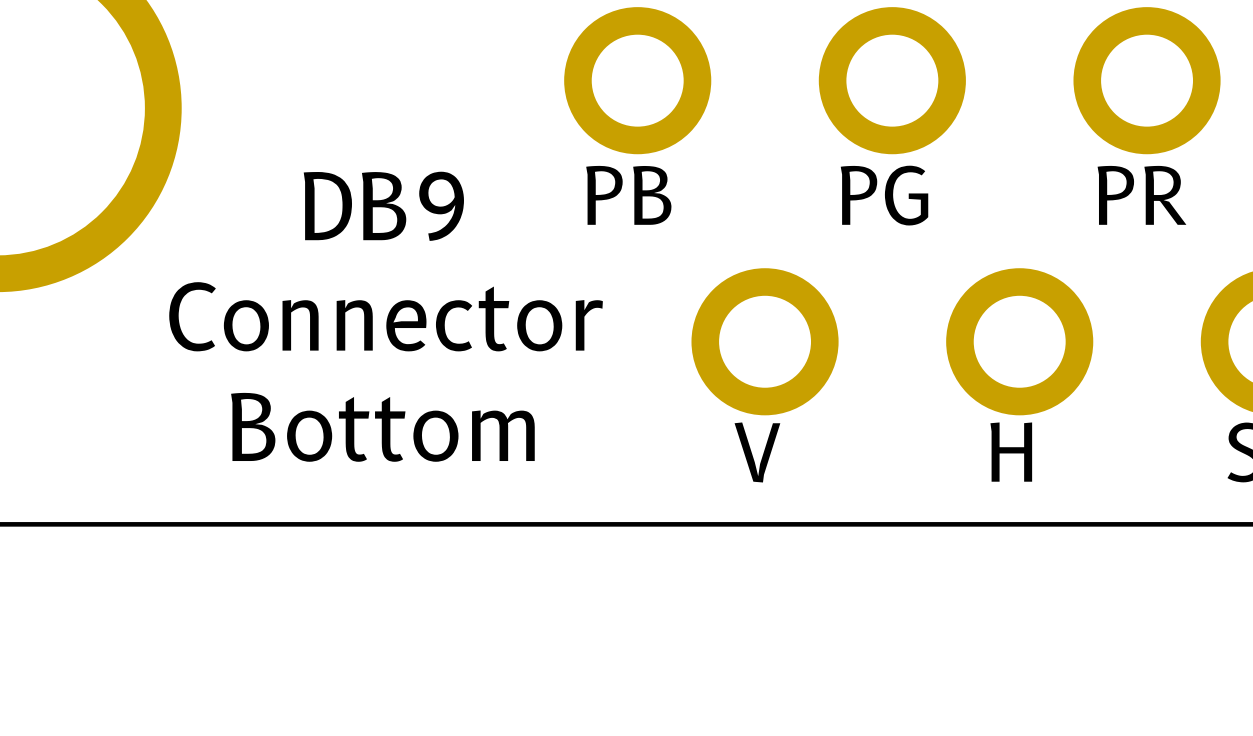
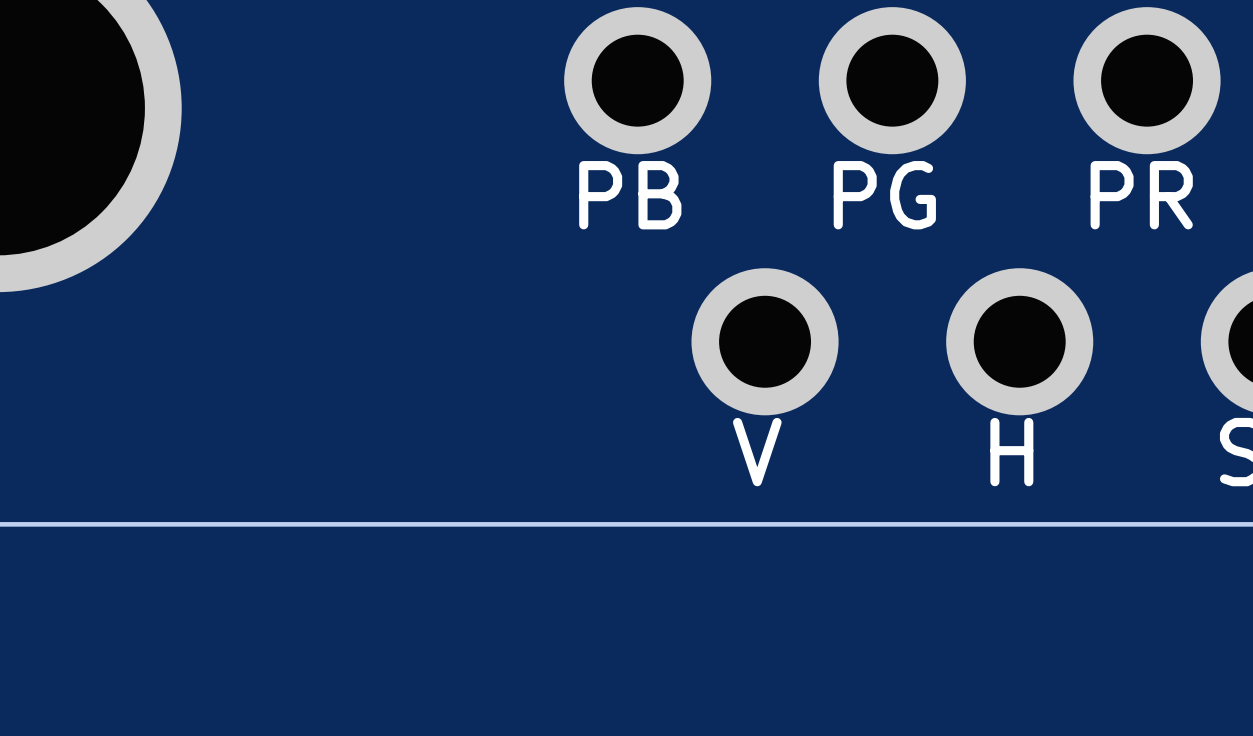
text: DB9 (383, 206) -> none
text: Connector (386, 316) -> none
text: Bottom (382, 427) -> none

